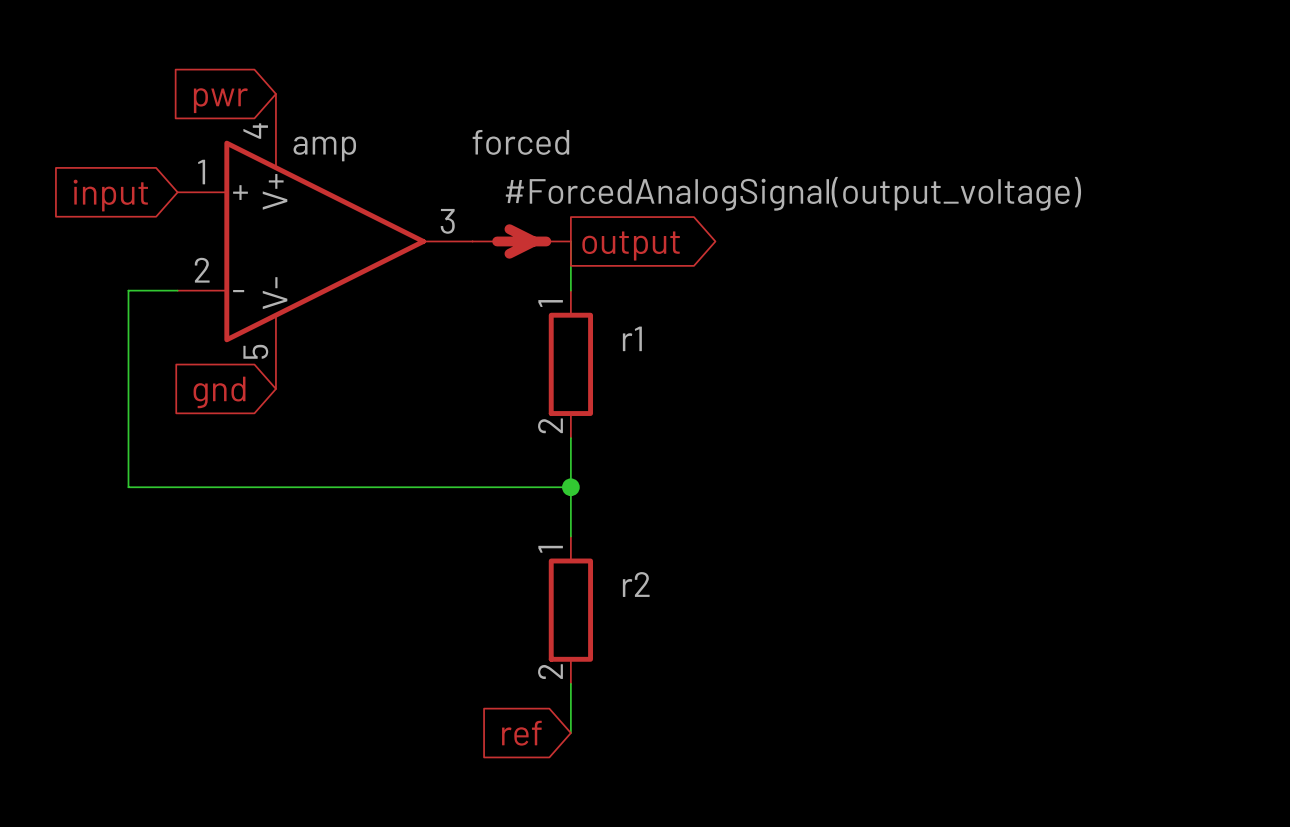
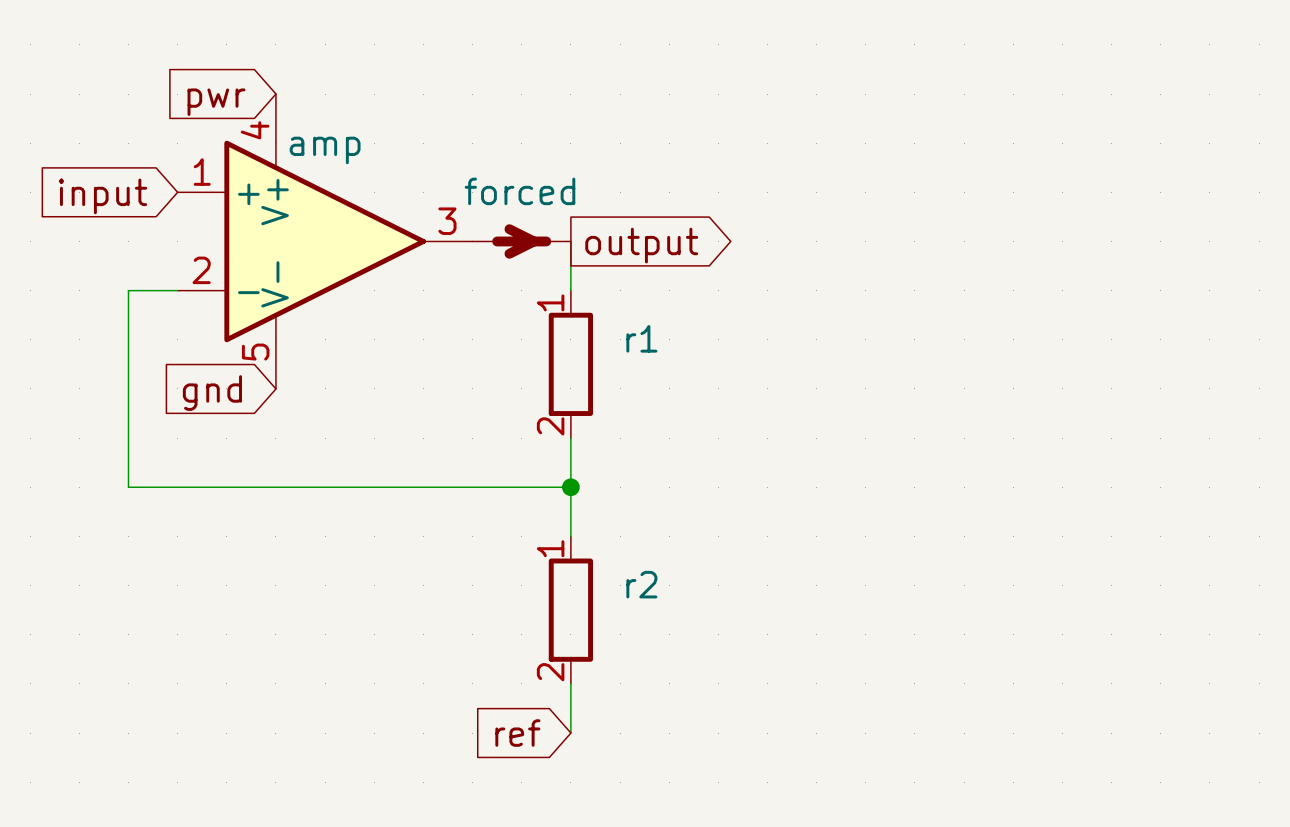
forced name position: forced (520, 142) -> forced (519, 191)
forced value: #ForcedAnalogSignal(output_voltage) (793, 193) -> none

